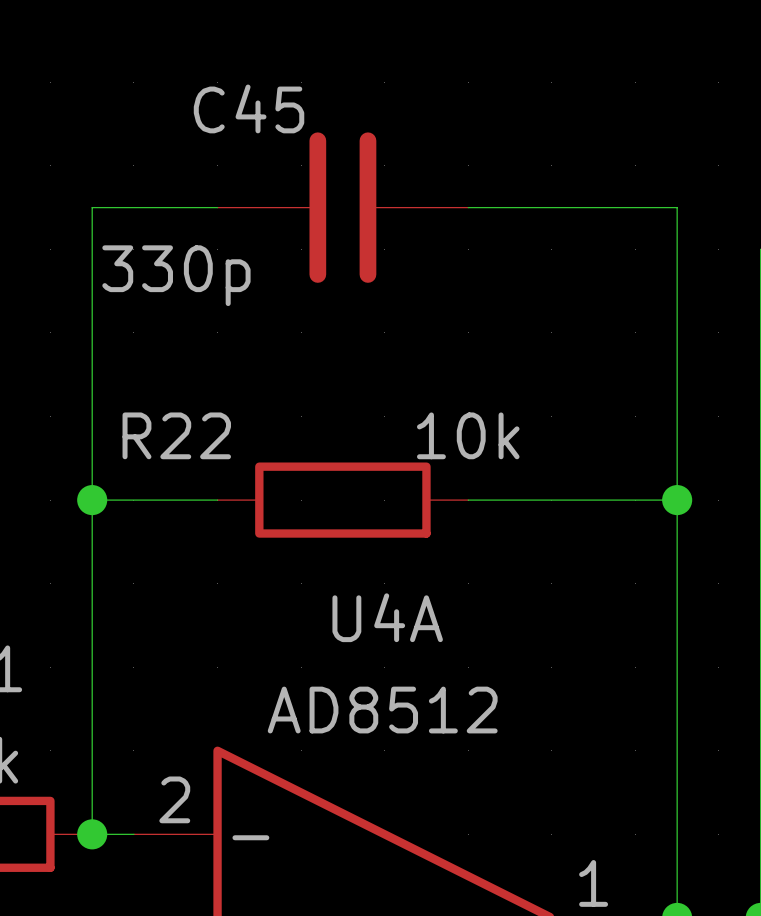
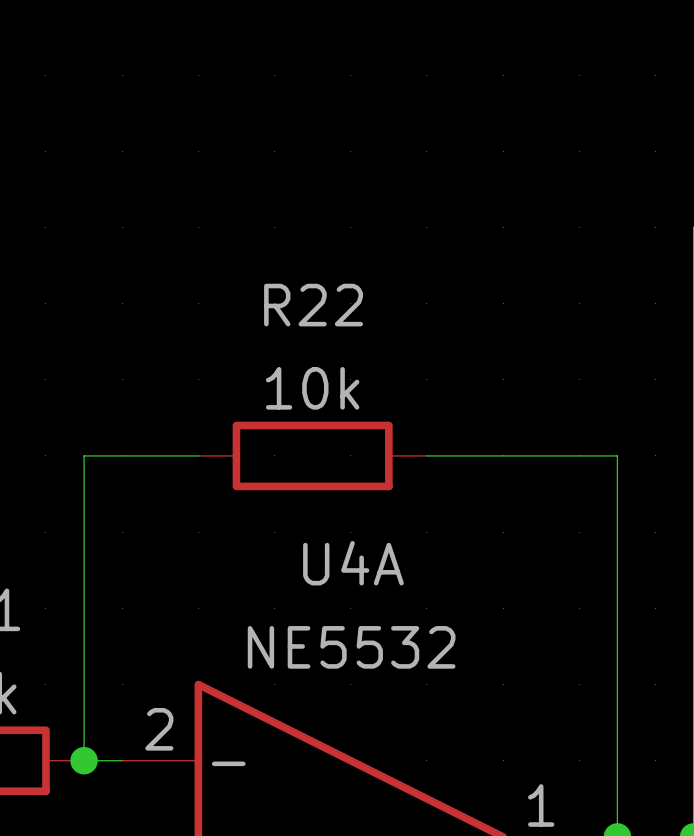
wire: (217, 207) (92, 207) (92, 500) -> none
C45: 330p (342, 207) -> none
wire: (468, 207) (677, 207) (677, 500) -> none
R22 name position: R22 (176, 435) -> R22 (313, 305)
R22 value position: 10k (468, 435) -> 10k (312, 388)
junction: (92, 500) -> none
junction: (677, 500) -> none
U4A value: AD8512 (382, 710) -> NE5532 (351, 647)

